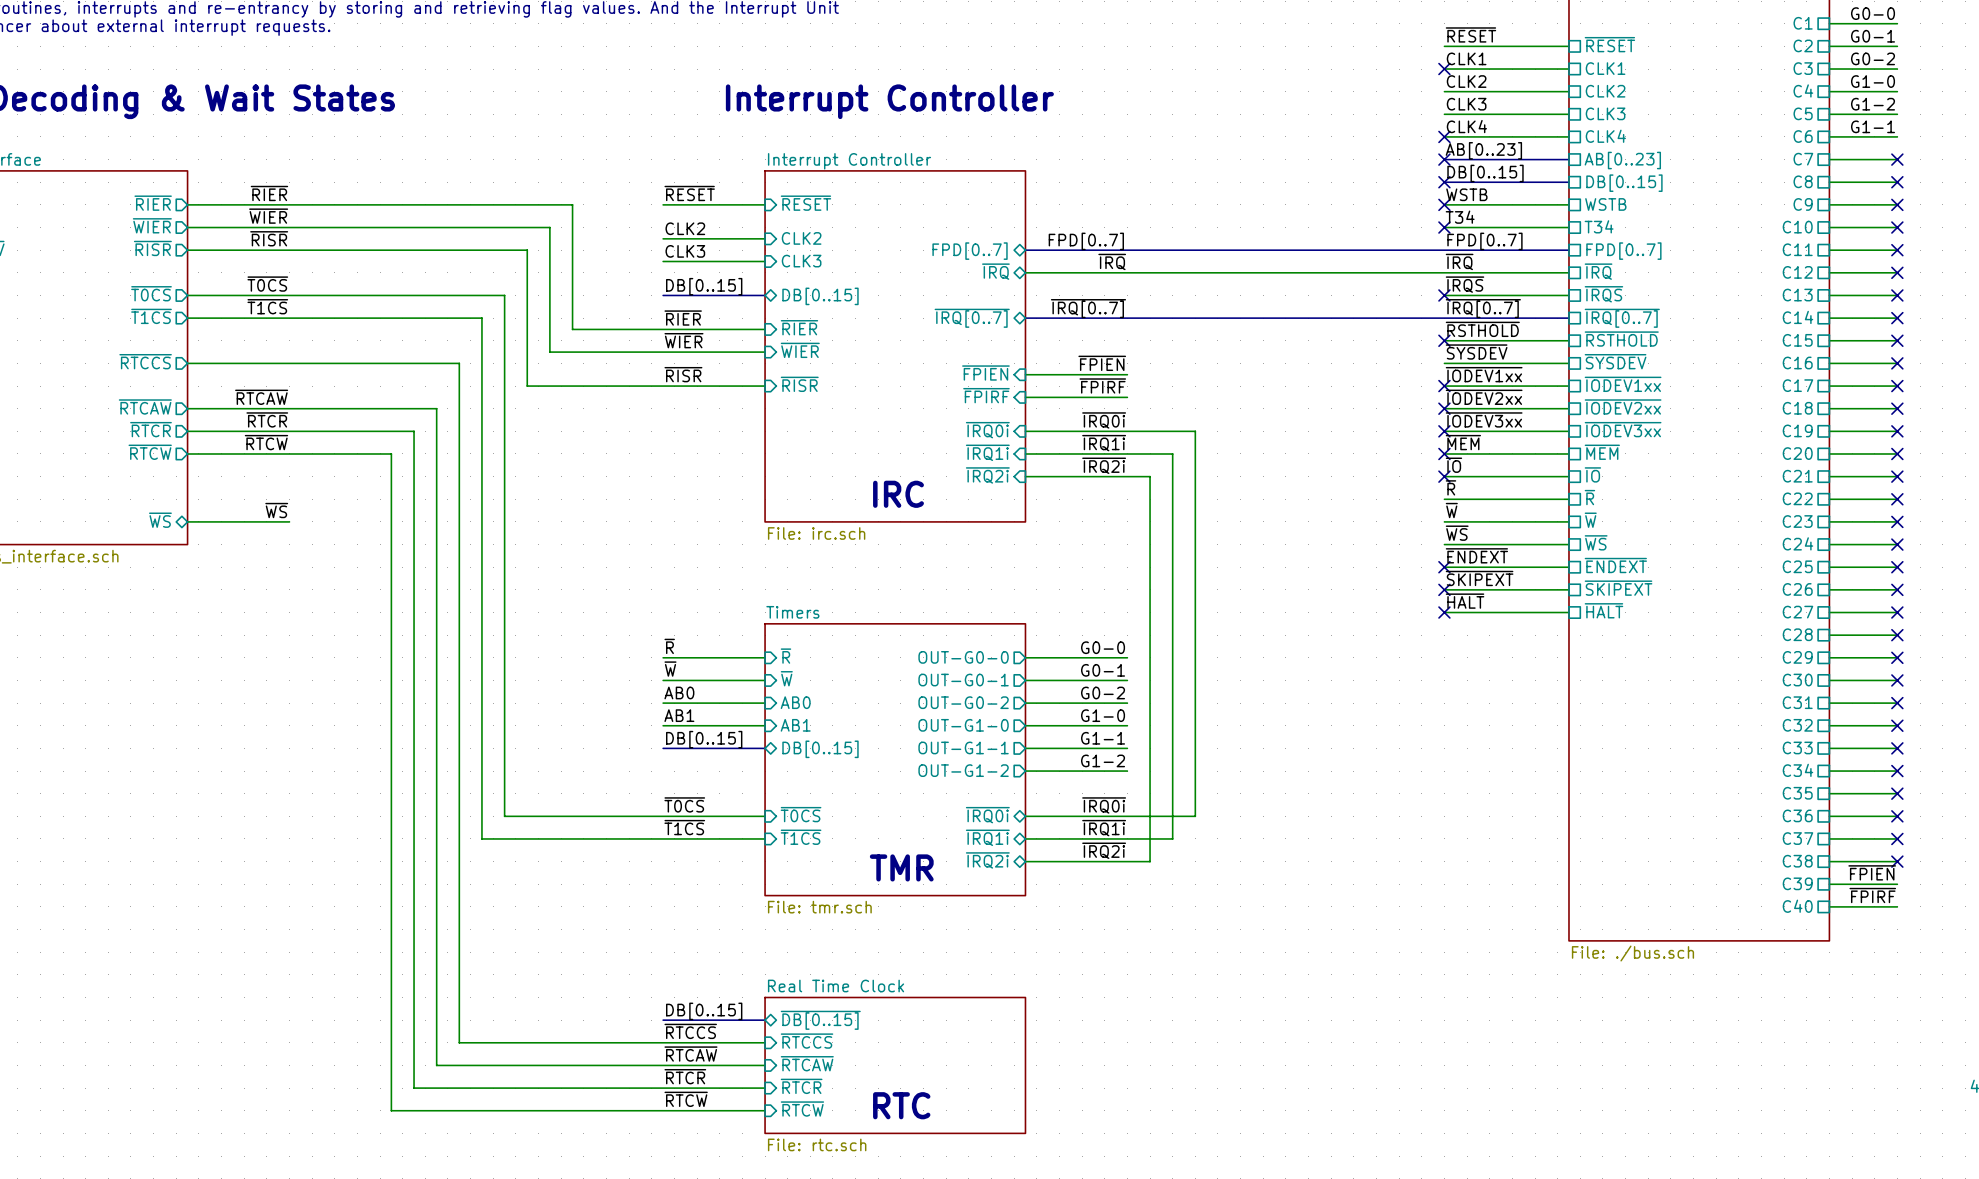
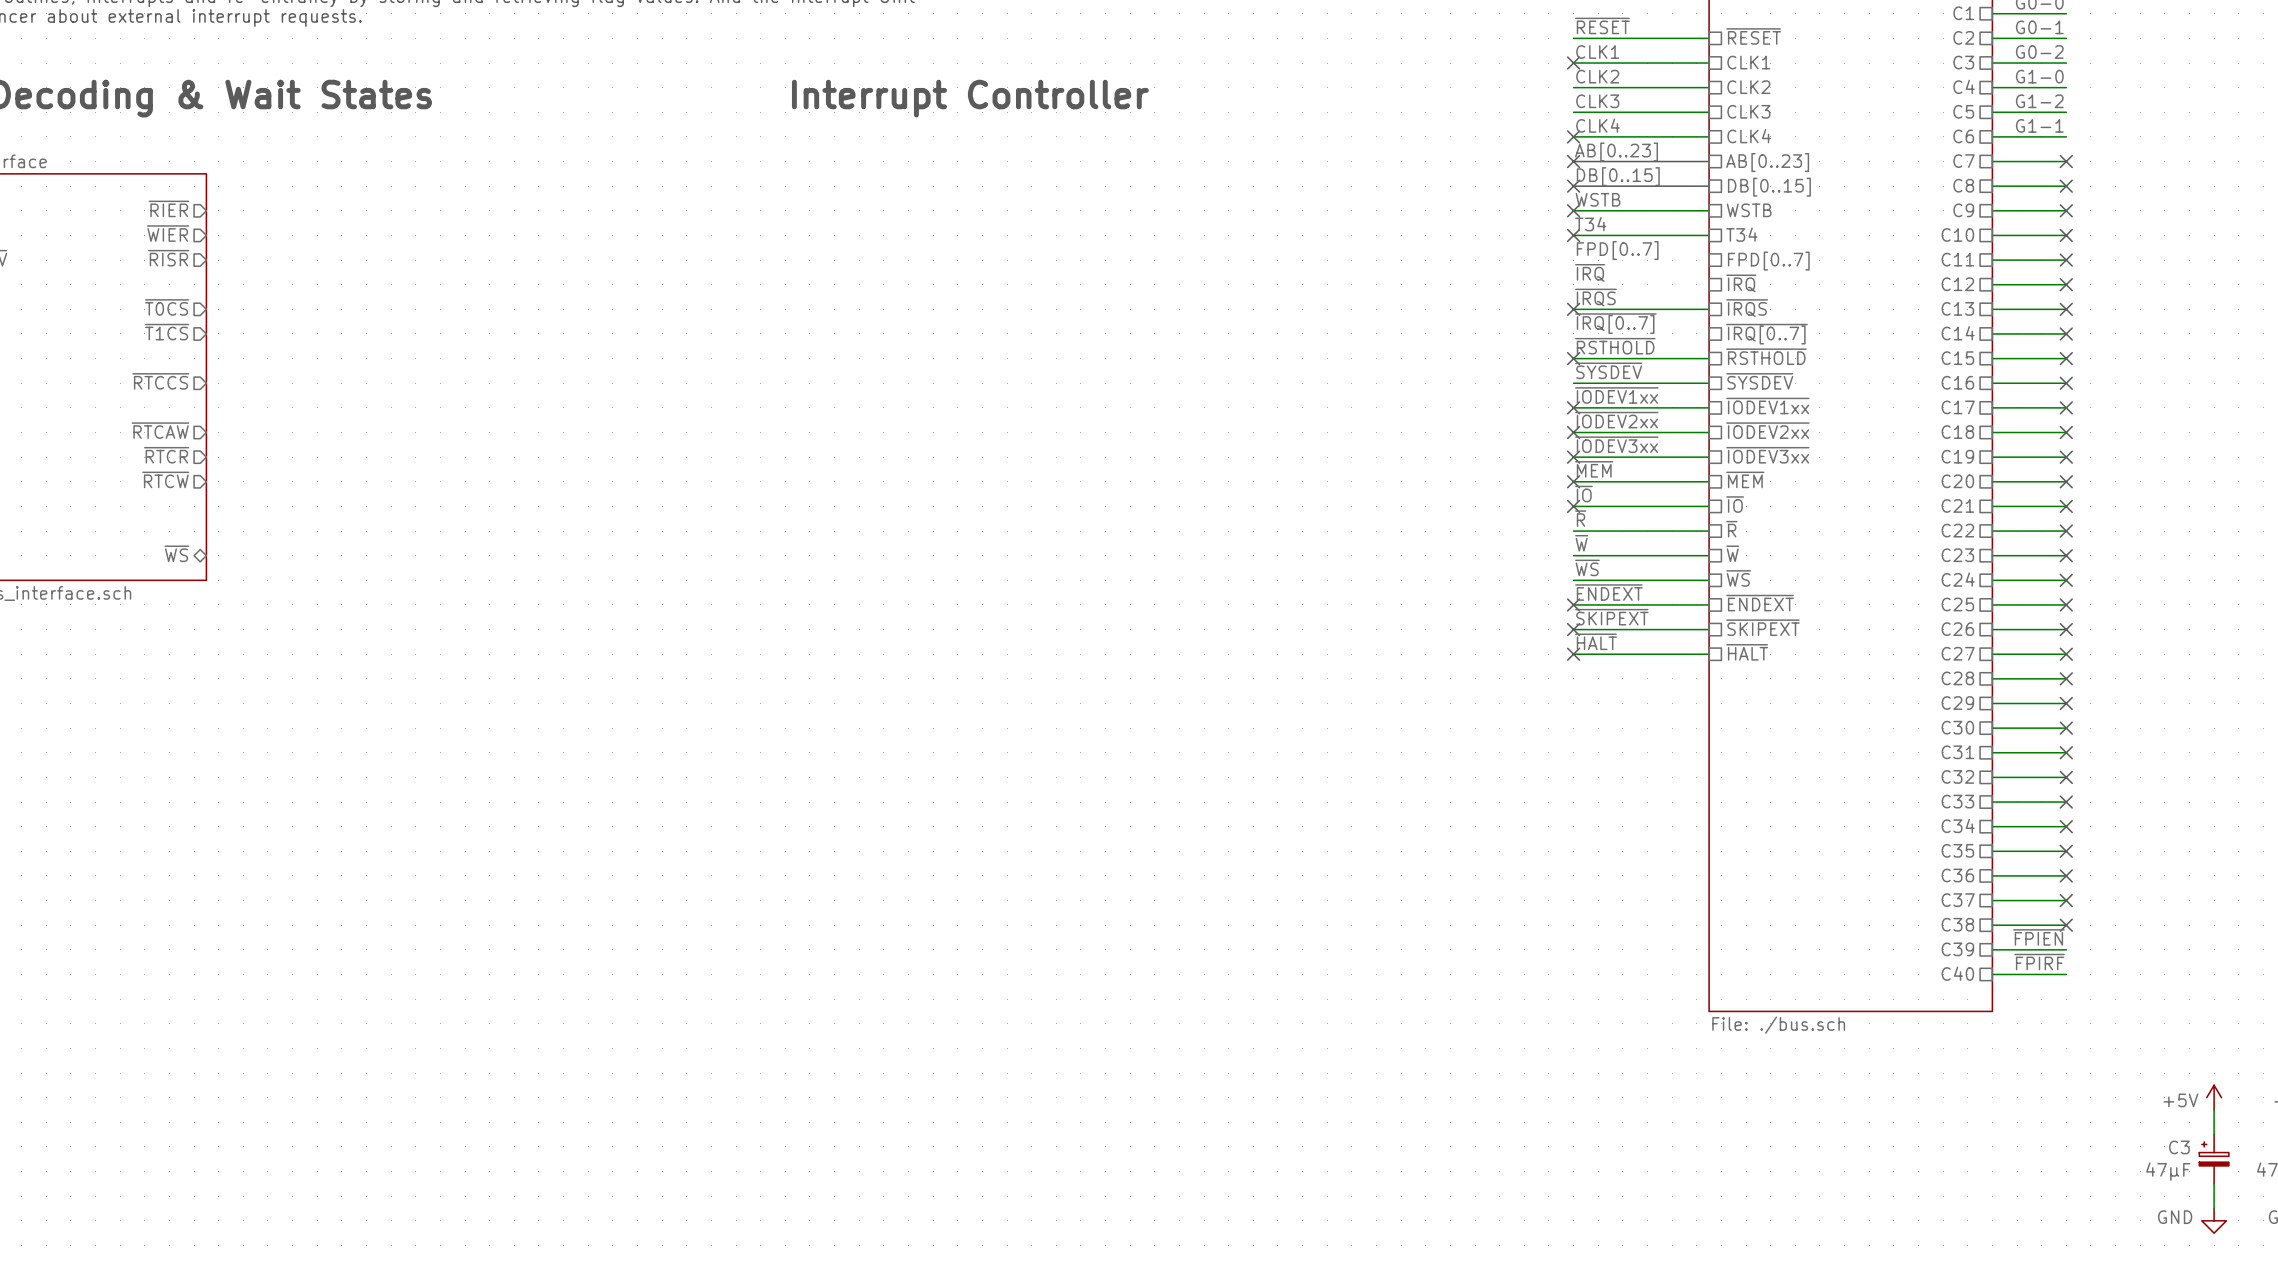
label: ~{RIER} (269, 193) -> none
label: ~{RESET} (689, 193) -> none
sheet pin: ~{RESET} (805, 203) -> none
wire: (187, 204) (572, 204) (572, 329) (765, 329) -> none
wire: (663, 204) (765, 204) -> none
label: ~{WIER} (268, 216) -> none
wire: (187, 227) (549, 227) (549, 352) (765, 352) -> none
label: CLK2 (685, 228) -> none
label: ~{RISR} (269, 238) -> none
wire: (663, 238) (765, 238) -> none
sheet pin: CLK2 (801, 238) -> none
label: FPD[0..7] (1086, 241) -> none
wire: (187, 250) (527, 250) (527, 386) (765, 386) -> none
bus: (1025, 250) (1568, 250) -> none
label: CLK3 (685, 251) -> none
sheet pin: FPD[0..7] (970, 251) -> none
wire: (663, 261) (765, 261) -> none
sheet pin: CLK3 (801, 261) -> none
label: ~{IRQ} (1112, 261) -> none
sheet pin: ~{IRQ} (995, 271) -> none
wire: (1025, 272) (1568, 272) -> none
label: ~{T0CS} (267, 284) -> none
label: DB[0..15] (704, 286) -> none
wire: (187, 295) (504, 295) (504, 816) (765, 816) -> none
bus: (663, 295) (765, 295) -> none
sheet pin: DB[0..15] (820, 296) -> none
label: ~{T1CS} (267, 306) -> none
label: ~{IRQ[0..7]} (1088, 308) -> none
wire: (187, 318) (481, 318) (481, 838) (765, 838) -> none
label: ~{RIER} (683, 318) -> none
sheet pin: ~{IRQ[0..7]} (972, 318) -> none
bus: (1025, 318) (1568, 318) -> none
sheet pin: ~{RIER} (799, 327) -> none
label: ~{WIER} (683, 340) -> none
sheet Interrupt Controller: File: irc.sch (895, 346) -> none
sheet pin: ~{WIER} (800, 350) -> none
wire: (187, 363) (459, 363) (459, 1042) (765, 1042) -> none
label: ~{FPIEN} (1102, 363) -> none
sheet pin: ~{FPIEN} (985, 373) -> none
label: ~{RISR} (683, 374) -> none
wire: (1025, 374) (1127, 374) -> none
sheet pin: ~{RISR} (799, 384) -> none
label: ~{FPIRF} (1102, 385) -> none
sheet pin: ~{FPIRF} (986, 395) -> none
label: ~{RTCAW} (261, 397) -> none
wire: (1025, 397) (1127, 397) -> none
wire: (187, 408) (436, 408) (436, 1065) (765, 1065) -> none
label: ~{RTCR} (267, 419) -> none
label: ~{IRQ0i} (1104, 420) -> none
sheet pin: ~{IRQ0i} (987, 430) -> none
wire: (187, 431) (414, 431) (414, 1088) (765, 1088) -> none
wire: (1025, 431) (1195, 431) (1195, 816) (1025, 816) -> none
label: ~{RTCW} (266, 442) -> none
label: ~{IRQ1i} (1104, 443) -> none
sheet pin: ~{IRQ1i} (987, 452) -> none
wire: (187, 453) (391, 453) (391, 1110) (765, 1110) -> none
wire: (1025, 453) (1172, 453) (1172, 838) (1025, 838) -> none
label: ~{IRQ2i} (1104, 465) -> none
sheet pin: ~{IRQ2i} (987, 475) -> none
wire: (1025, 476) (1150, 476) (1150, 861) (1025, 861) -> none
text: IRC (898, 494) -> none
label: ~{WS} (276, 510) -> none
wire: (187, 521) (289, 521) -> none
label: ~{R} (669, 646) -> none
label: G0-0 (1103, 647) -> none
sheet pin: ~{R} (785, 656) -> none
wire: (663, 657) (765, 657) -> none
sheet pin: OUT-G0-0 (963, 657) -> none
wire: (1025, 657) (1127, 657) -> none
label: ~{W} (670, 669) -> none
label: G0-1 (1103, 670) -> none
sheet pin: ~{W} (786, 678) -> none
wire: (663, 680) (765, 680) -> none
sheet pin: OUT-G0-1 (963, 680) -> none
wire: (1025, 680) (1127, 680) -> none
label: AB0 (679, 693) -> none
label: G0-2 (1103, 693) -> none
sheet pin: AB0 (795, 702) -> none
sheet pin: OUT-G0-2 (963, 702) -> none
wire: (663, 703) (765, 703) -> none
wire: (1025, 703) (1127, 703) -> none
label: AB1 (679, 715) -> none
label: G1-0 (1103, 715) -> none
wire: (663, 725) (765, 725) -> none
sheet pin: AB1 (795, 725) -> none
sheet pin: OUT-G1-0 (963, 725) -> none
wire: (1025, 725) (1127, 725) -> none
label: G1-1 (1103, 738) -> none
label: DB[0..15] (704, 739) -> none
sheet pin: OUT-G1-1 (963, 747) -> none
bus: (663, 748) (765, 748) -> none
wire: (1025, 748) (1127, 748) -> none
sheet pin: DB[0..15] (820, 749) -> none
sheet Timers: File: tmr.sch (895, 759) -> none
label: G1-2 (1103, 760) -> none
sheet pin: OUT-G1-2 (963, 770) -> none
wire: (1025, 771) (1127, 771) -> none
label: ~{T0CS} (684, 804) -> none
label: ~{IRQ0i} (1104, 805) -> none
sheet pin: ~{T0CS} (801, 814) -> none
sheet pin: ~{IRQ0i} (987, 815) -> none
label: ~{T1CS} (684, 827) -> none
label: ~{IRQ1i} (1104, 828) -> none
sheet pin: ~{T1CS} (801, 837) -> none
sheet pin: ~{IRQ1i} (987, 837) -> none
label: ~{IRQ2i} (1104, 850) -> none
sheet pin: ~{IRQ2i} (987, 860) -> none
text: TMR (901, 867) -> none
label: DB[0..15] (704, 1011) -> none
bus: (663, 1020) (765, 1020) -> none
sheet pin: ~{DB[0..15]} (820, 1020) -> none
label: ~{RTCCS} (690, 1031) -> none
sheet pin: ~{RTCCS} (807, 1041) -> none
label: ~{RTCAW} (690, 1054) -> none
sheet pin: ~{RTCAW} (807, 1063) -> none
sheet Real Time Clock: File: rtc.sch (895, 1065) -> none
label: ~{RTCR} (685, 1076) -> none
sheet pin: ~{RTCR} (801, 1086) -> none
label: ~{RTCW} (686, 1099) -> none
text: RTC (901, 1105) -> none
sheet pin: ~{RTCW} (802, 1109) -> none

